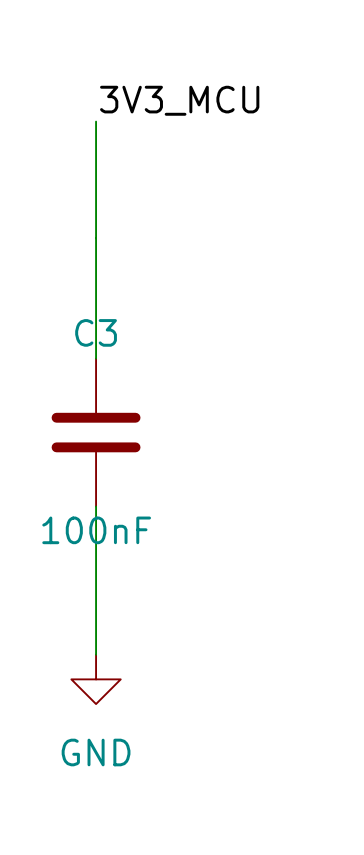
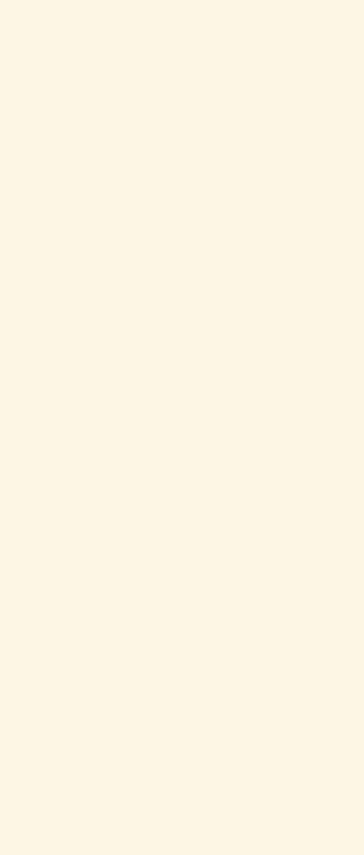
label: 3V3_MCU (179, 100) -> none
wire: (96, 121) (96, 358) -> none
C3: 100nF (96, 432) -> none
wire: (96, 506) (96, 654) -> none
power symbol: GND (96, 679) -> none

